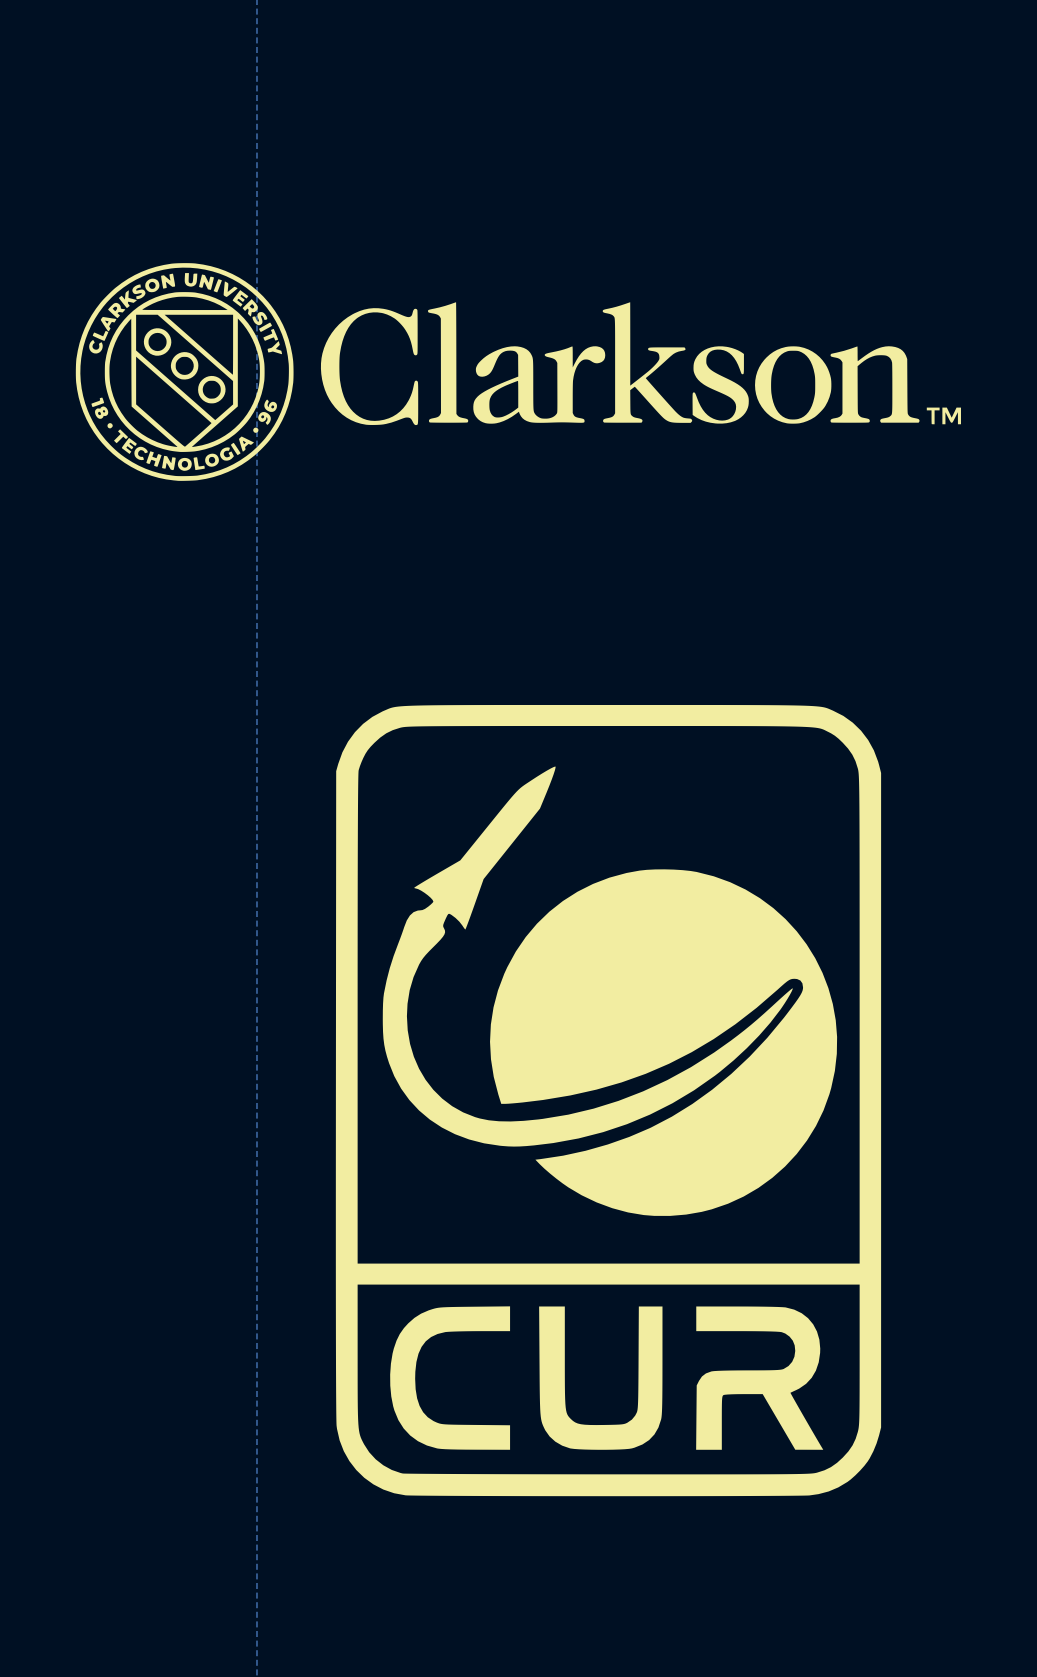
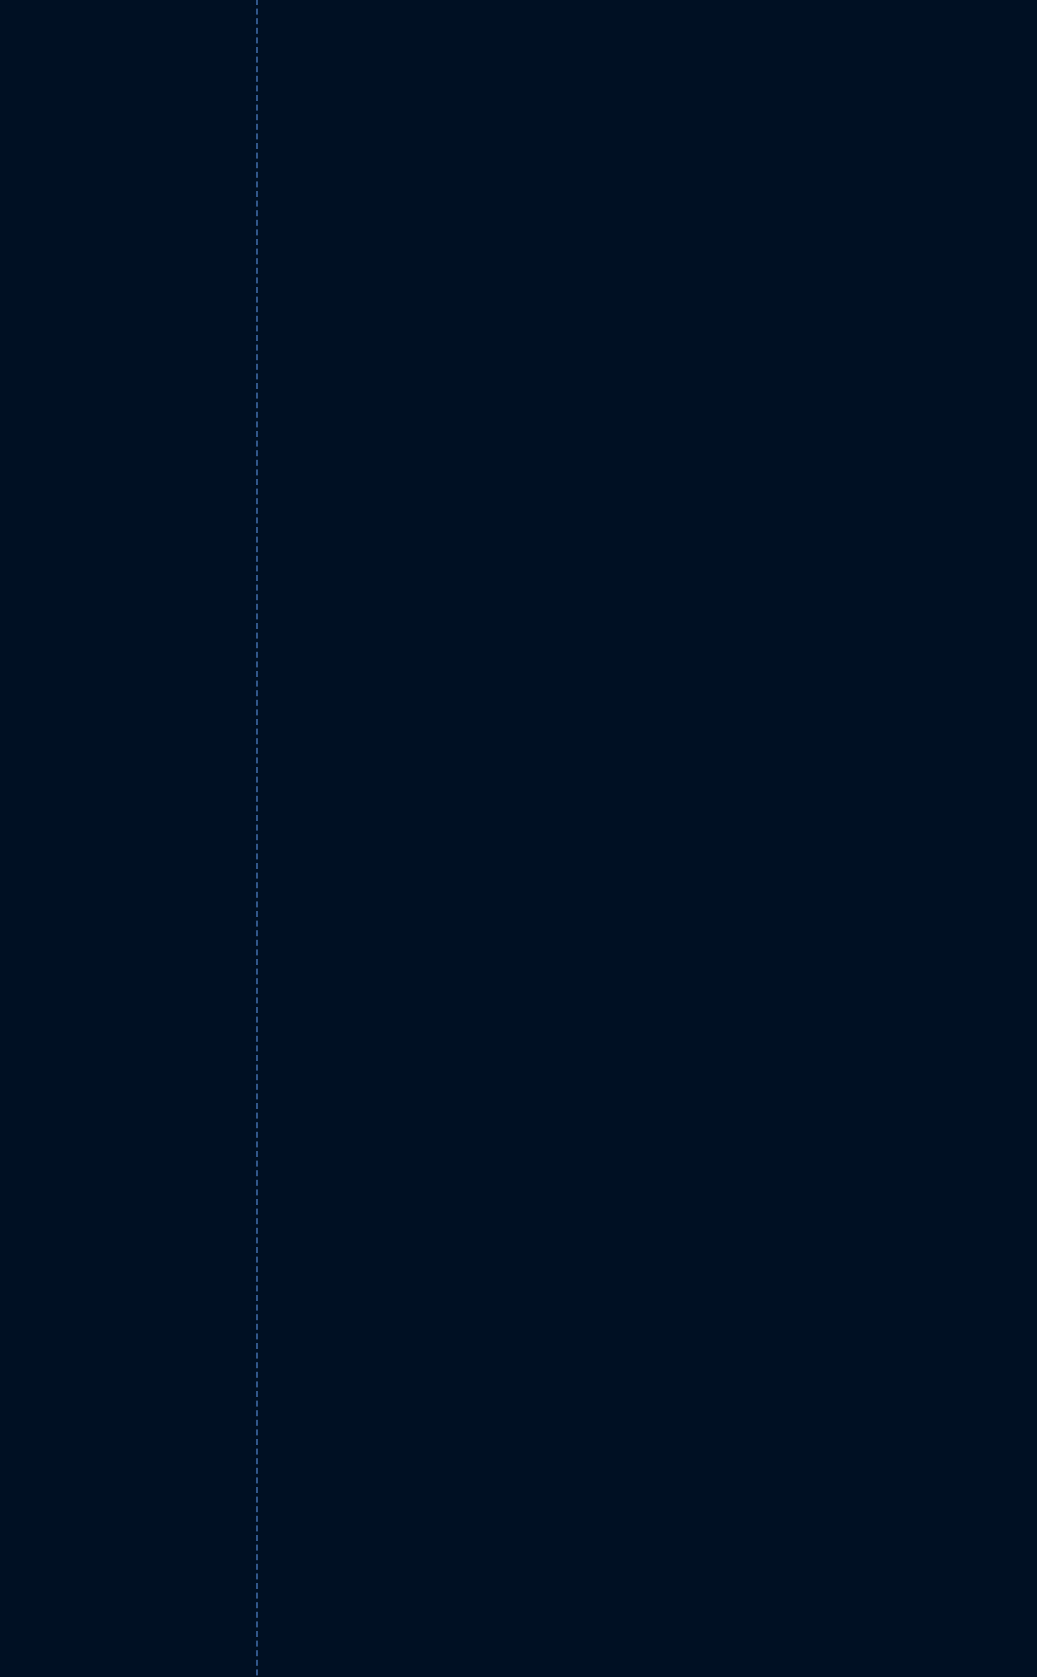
drawing: [75, 263, 961, 481] -> none
drawing: [335, 704, 882, 1497] -> none

